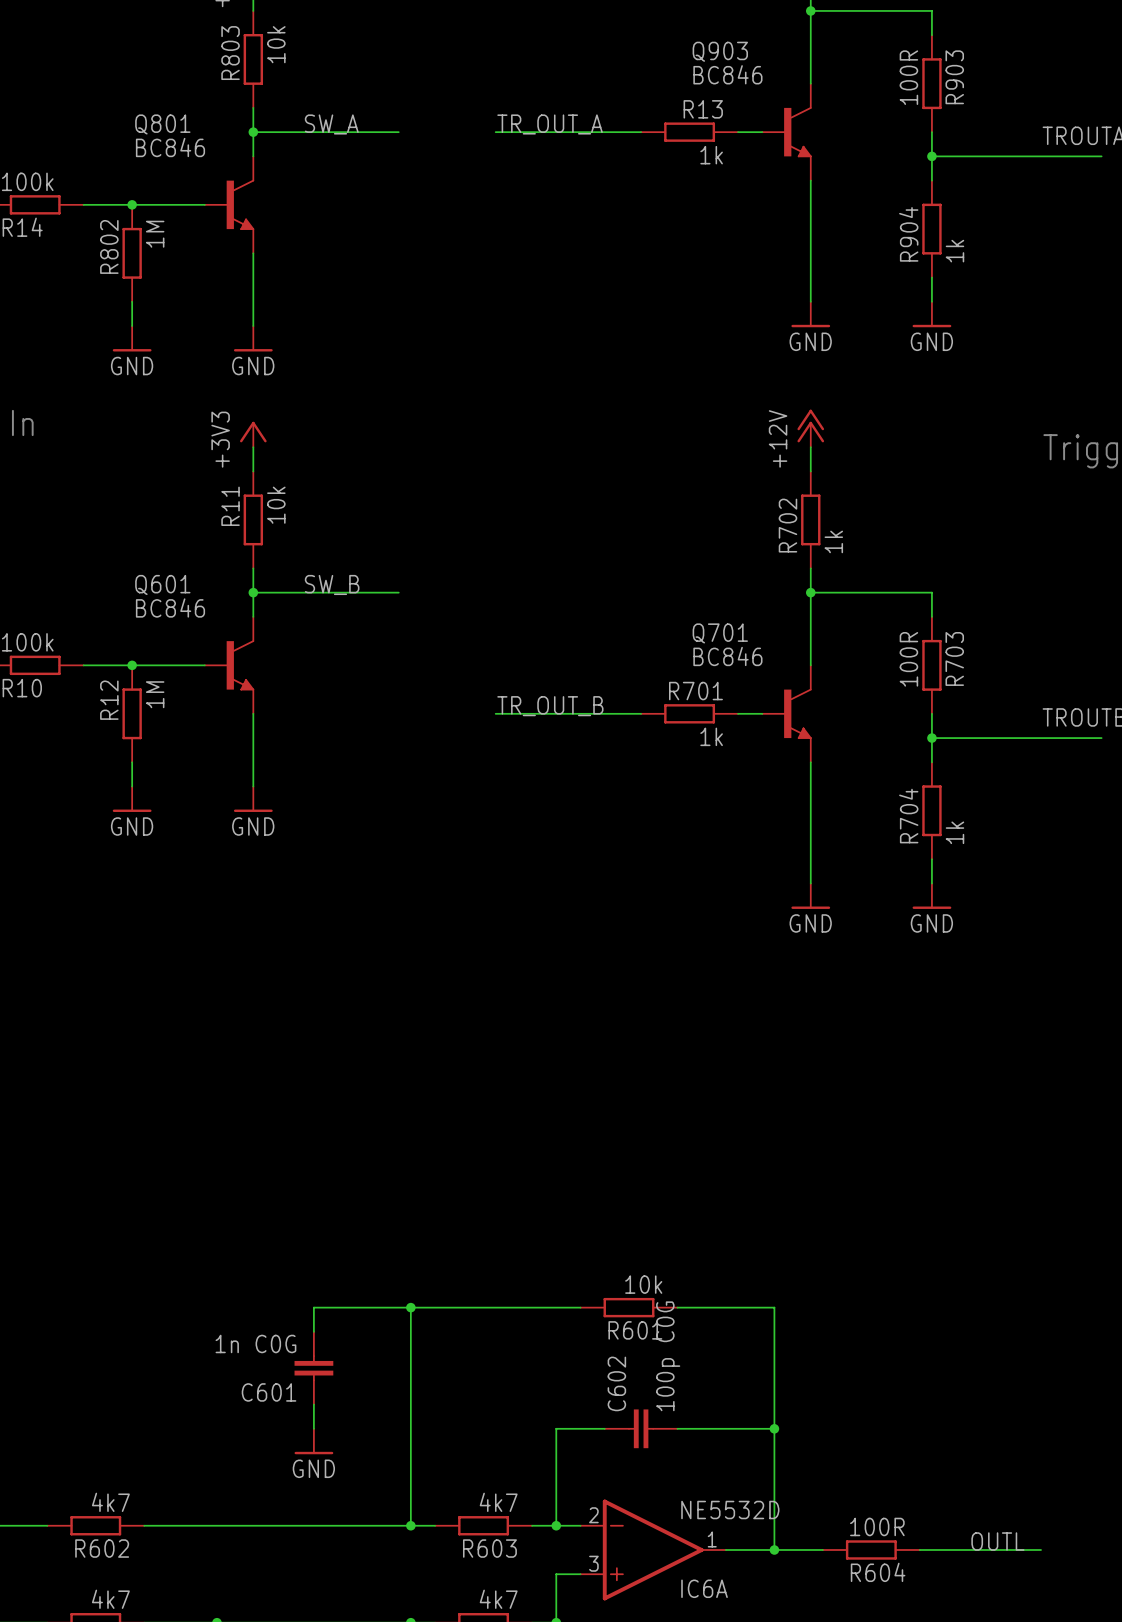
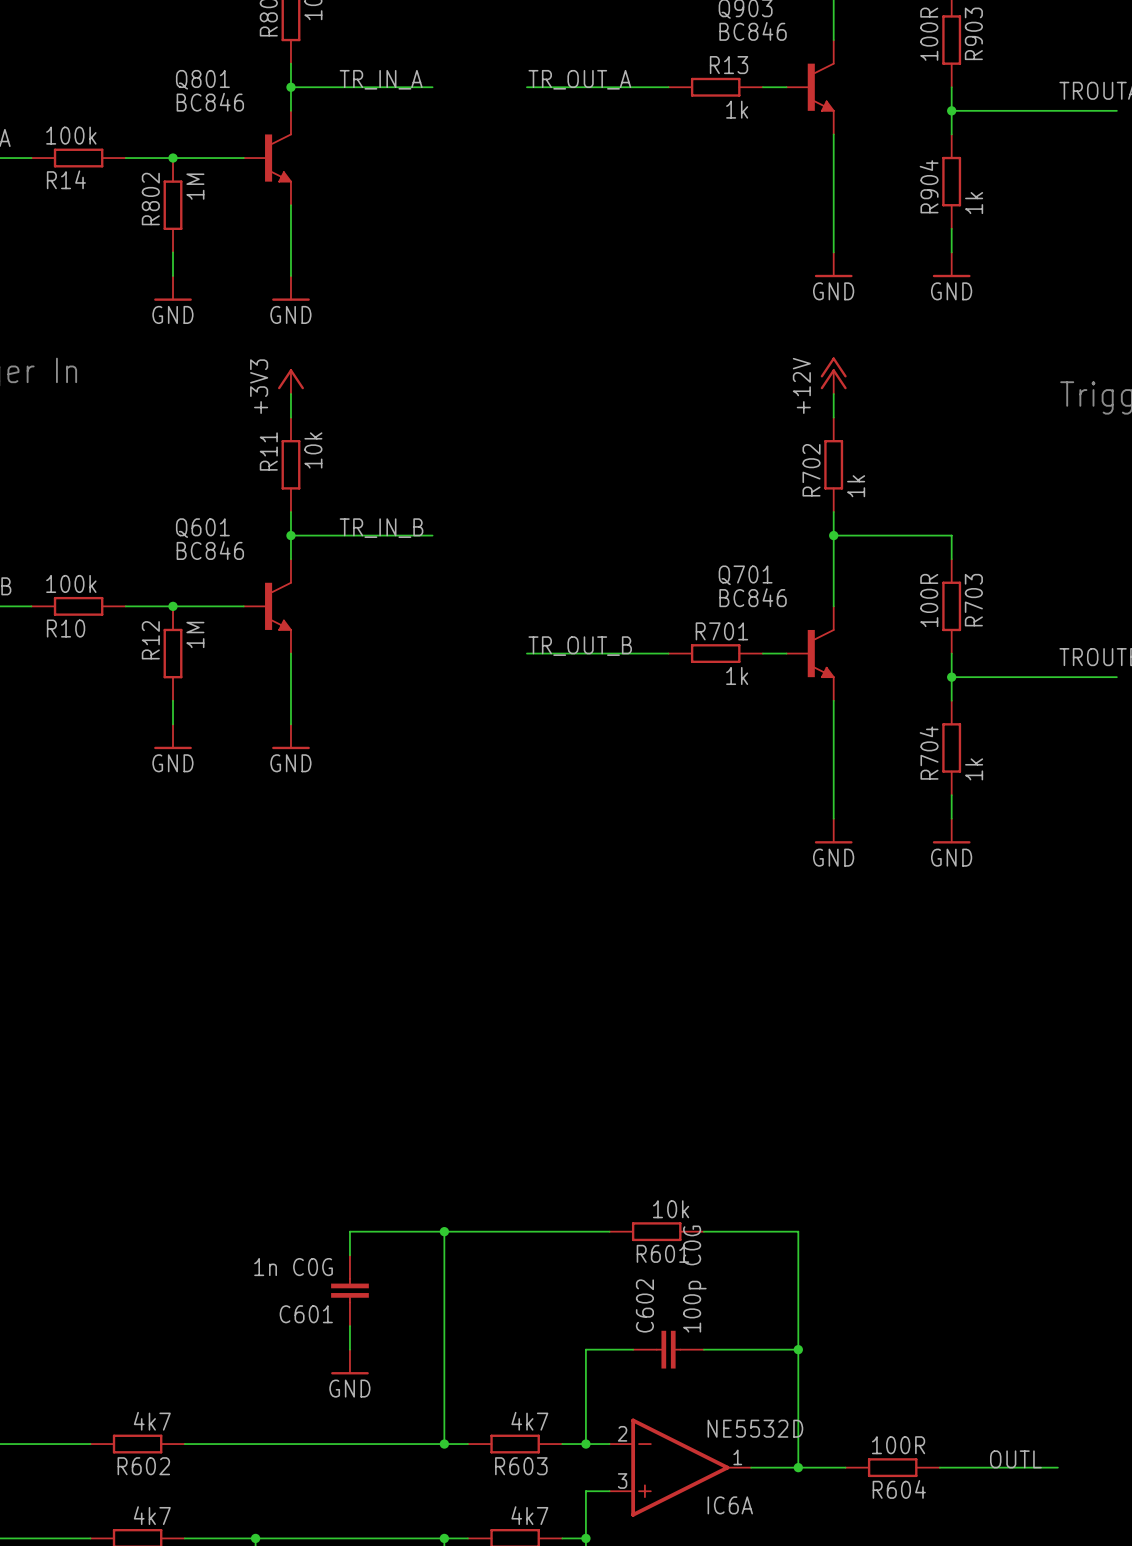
label: SW_A (331, 124) -> TR_IN_A (381, 79)
label: SW_B (332, 584) -> TR_IN_B (381, 528)

